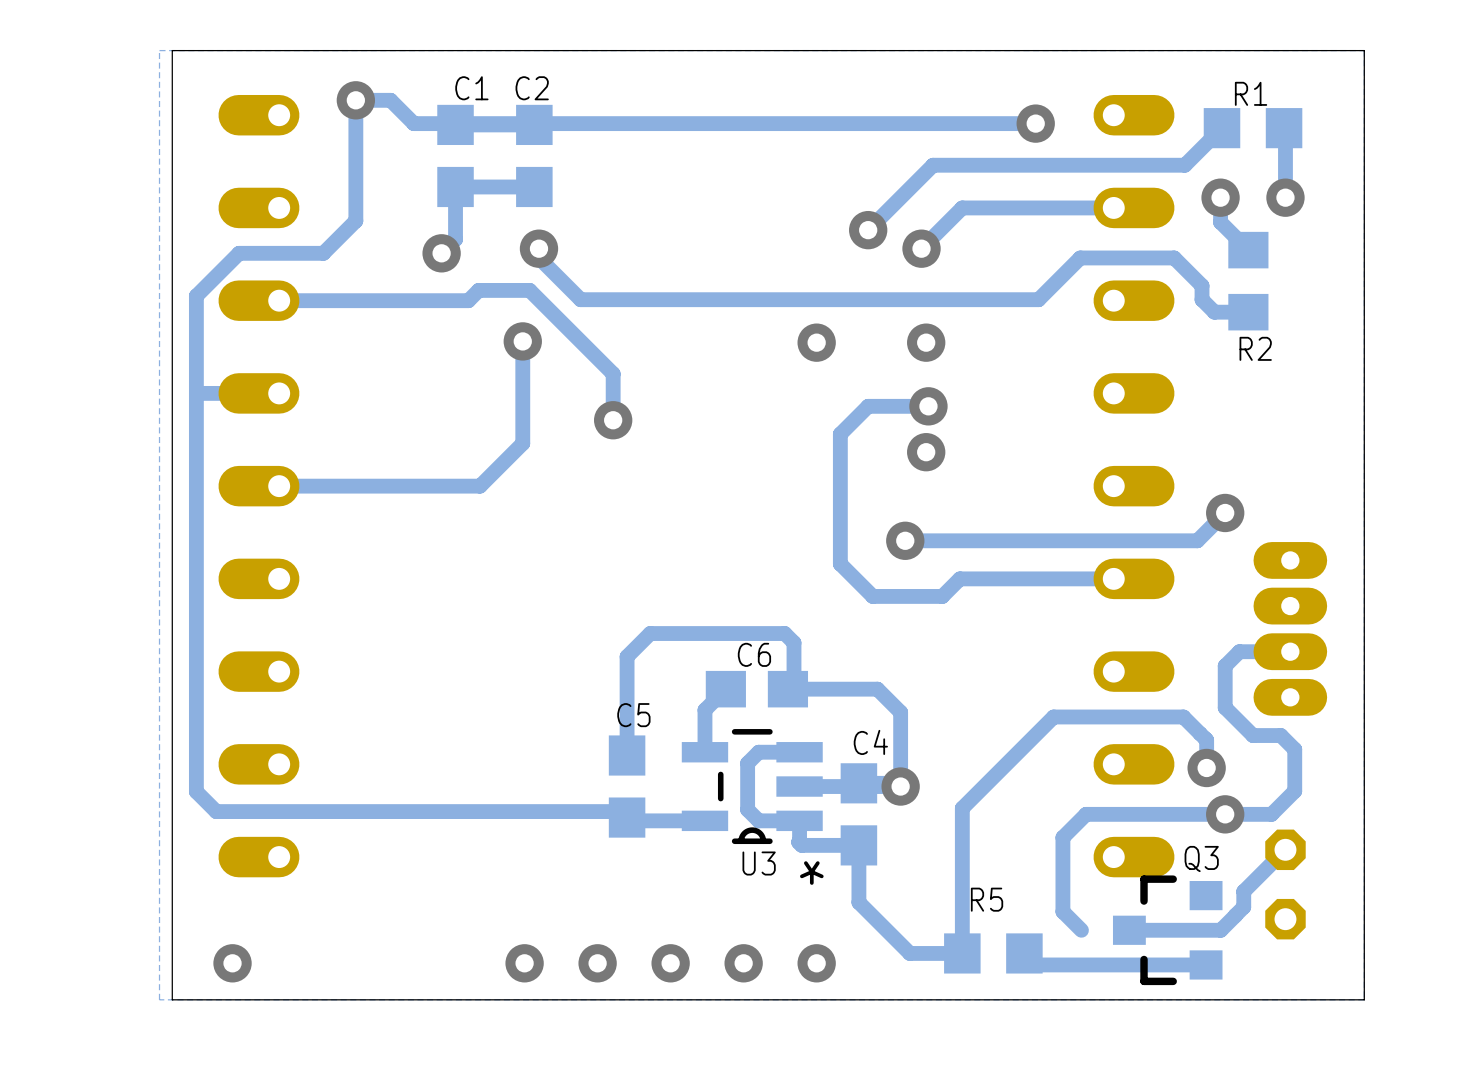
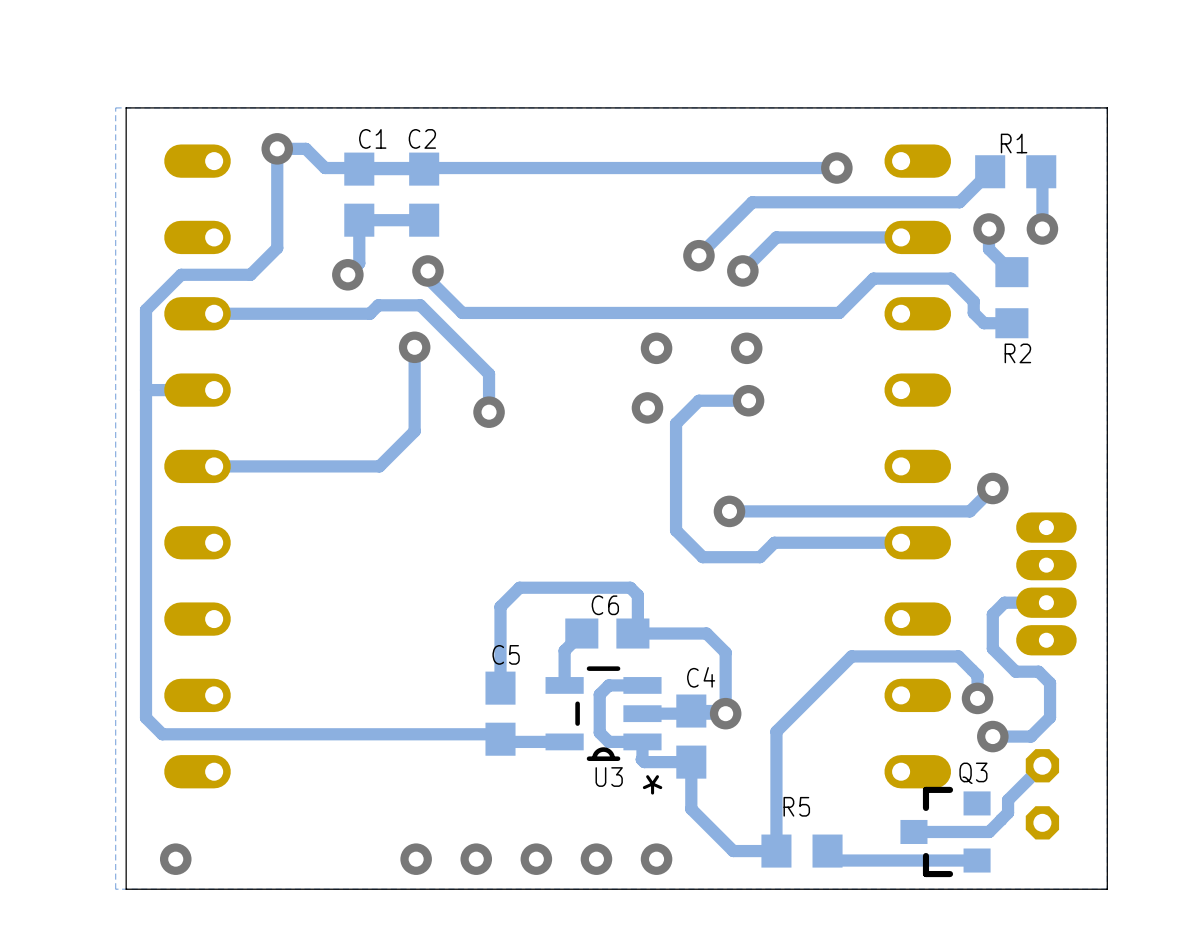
via position: (926, 452) -> (647, 407)
track: (1225, 814) (1225, 805) (1215, 814) (1086, 814) (1062, 837) (1062, 911) (1081, 930) -> none

